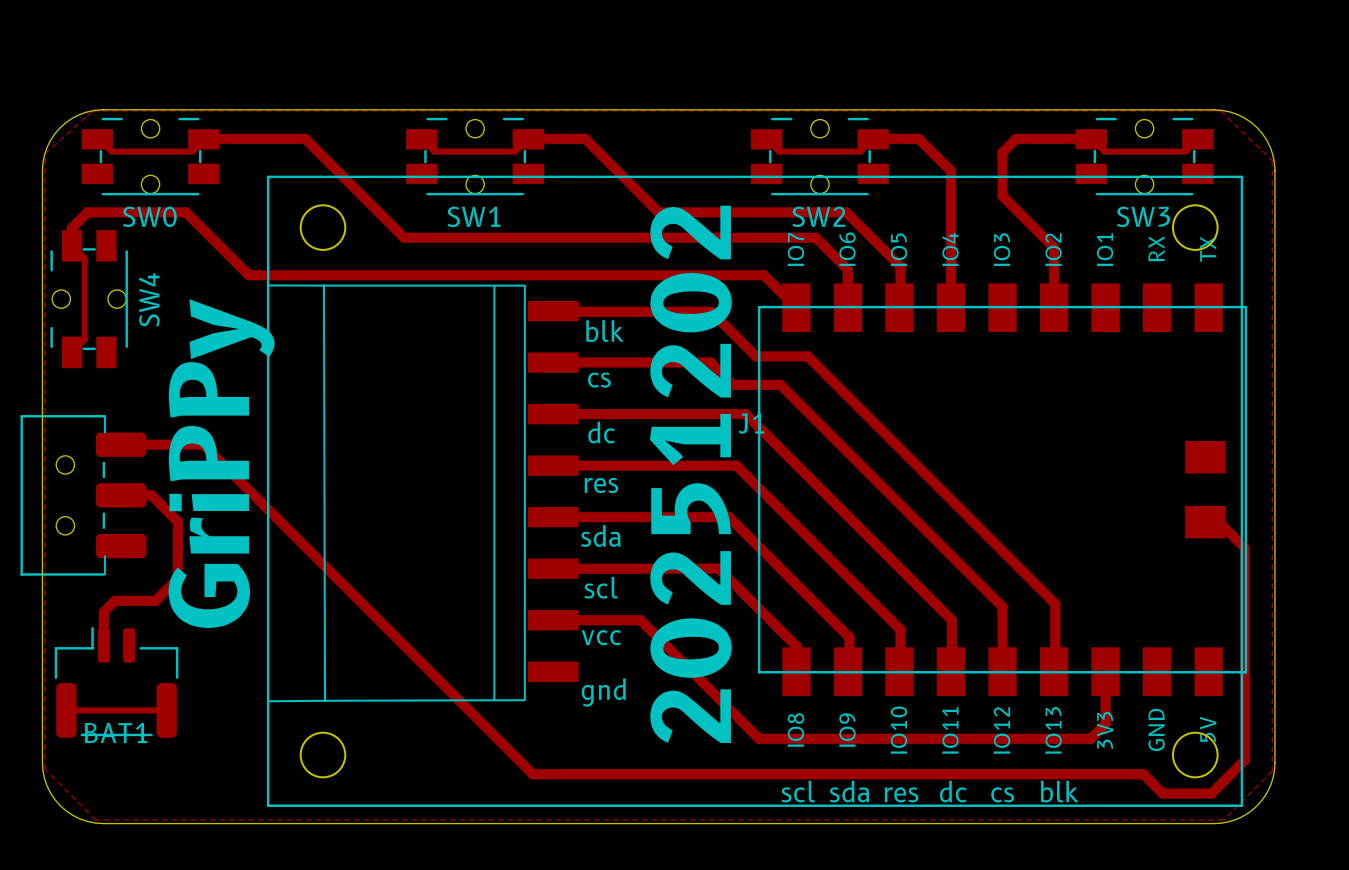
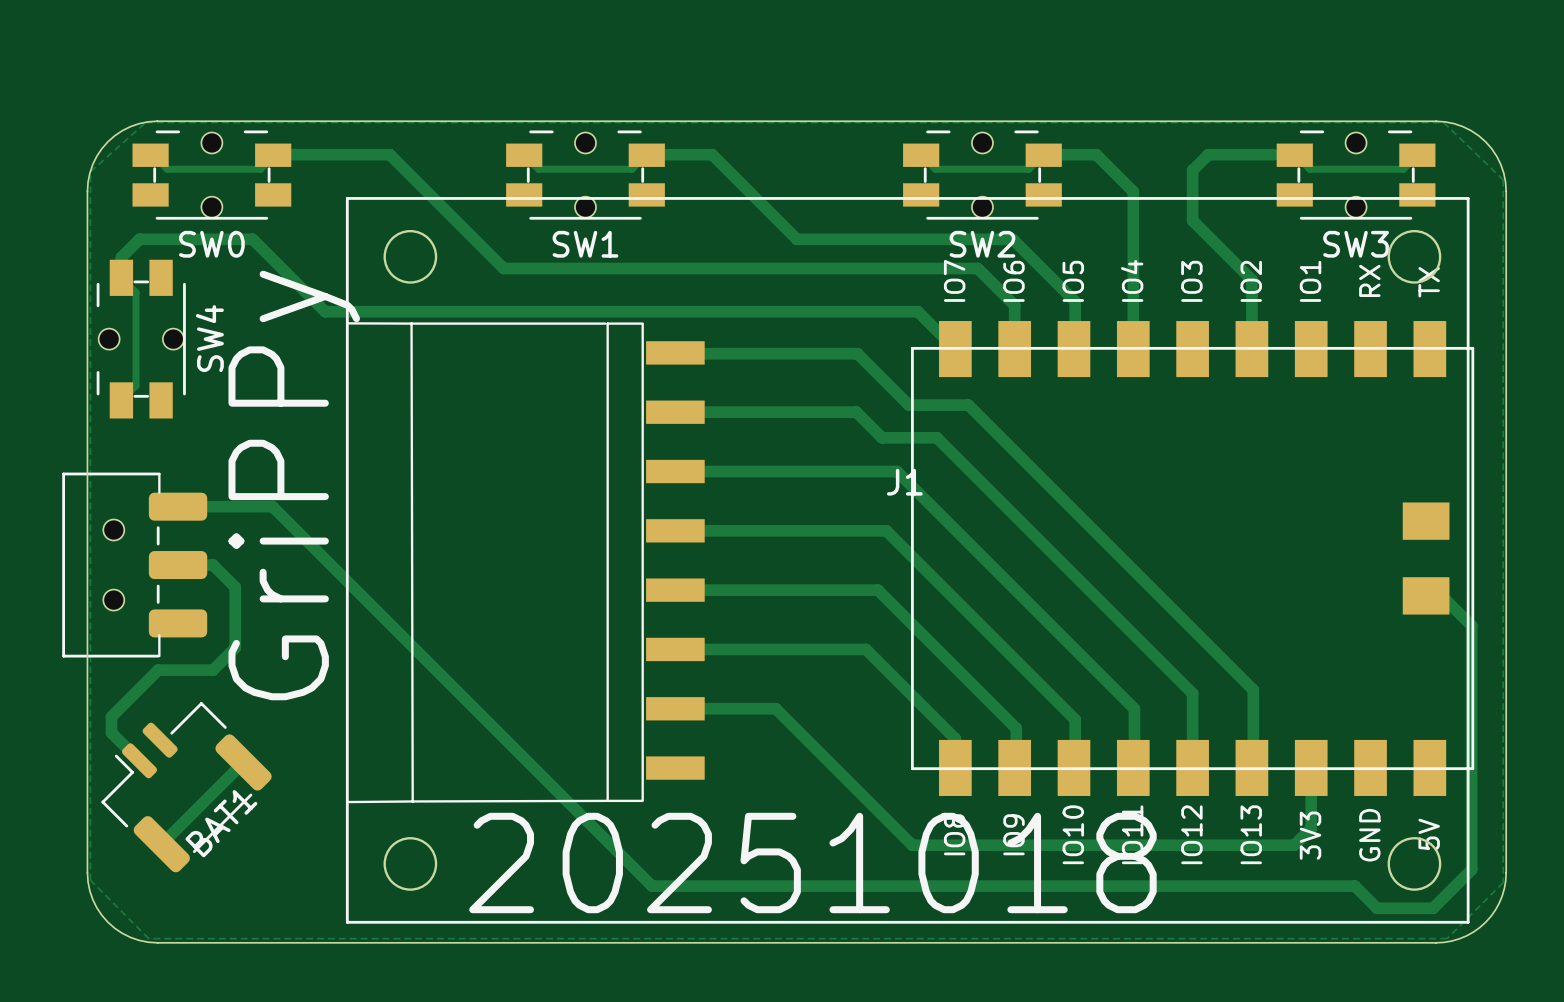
text: blk (604, 331) -> none
text: cs (599, 380) -> none
text: dc (601, 432) -> none
text: 20251202 (690, 474) -> 20251018 (812, 863)
text: res (601, 485) -> none
track: (170, 514) (177, 521) (177, 578) (155, 600) (115, 600) (103, 612) (103, 645) -> (235, 587) (235, 647) (213, 670) (158, 670) (111, 716) (111, 732) (139, 760)
text: sda (600, 535) -> none
text: scl (601, 587) -> none
text: vcc (601, 637) -> none
track: none -> (243, 762) (161, 844)
BAT1 rotation: 0° (116, 682) -> 45° counterclockwise (186, 787)
text: gnd (603, 692) -> none
track: (66, 710) (166, 710) -> none
text: scl (798, 791) -> none
text: sda (849, 791) -> none
text: dc (953, 791) -> none
text: blk (1059, 791) -> none
text: res (901, 794) -> none
text: cs (1002, 794) -> none

